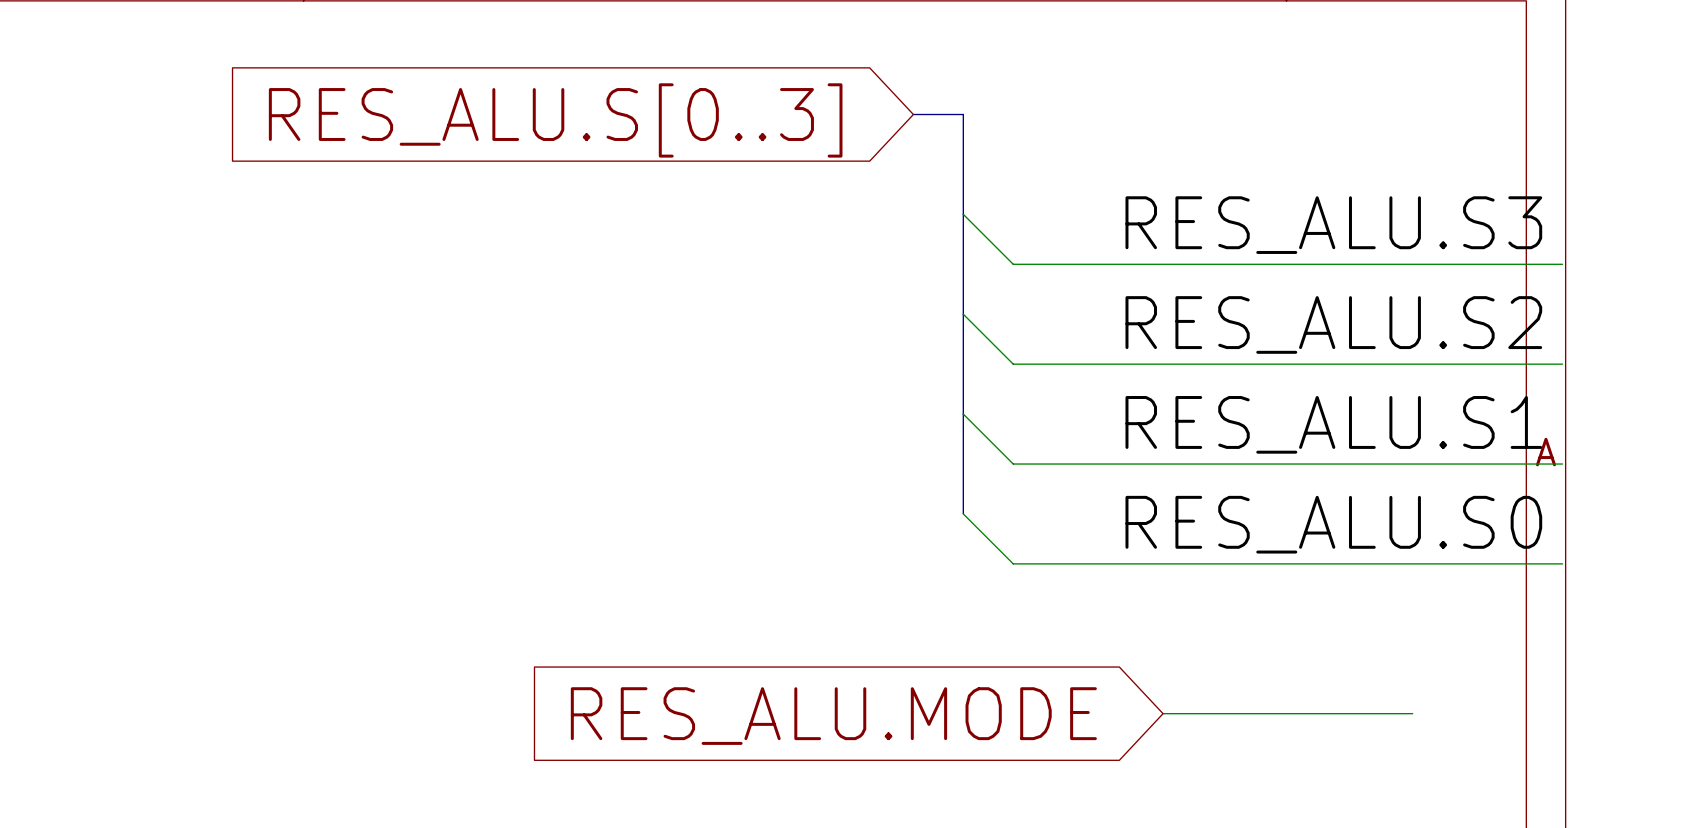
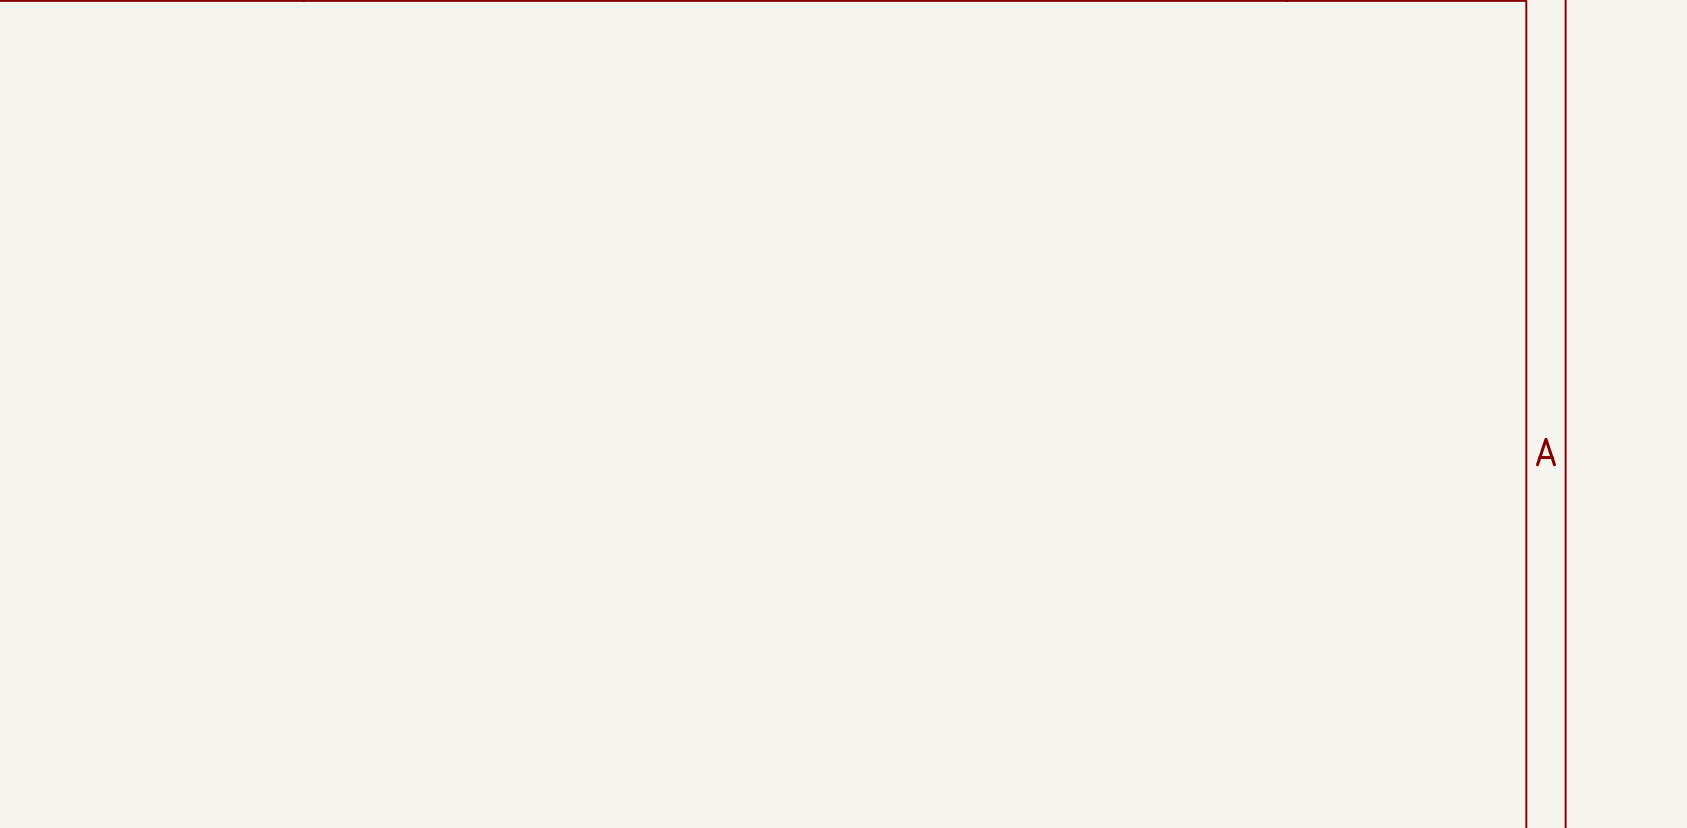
bus: (913, 114) (963, 114) (963, 513) -> none
global label: RES_ALU.S[0..3] (555, 120) -> none
wire: (963, 214) (1013, 264) (1562, 264) -> none
label: RES_ALU.S3 (1333, 225) -> none
wire: (963, 314) (1013, 364) (1562, 364) -> none
label: RES_ALU.S2 (1333, 324) -> none
wire: (963, 414) (1013, 464) (1562, 464) -> none
label: RES_ALU.S1 (1333, 424) -> none
wire: (963, 513) (1013, 563) (1562, 563) -> none
label: RES_ALU.S0 (1333, 524) -> none
wire: (1163, 713) (1412, 713) -> none
global label: RES_ALU.MODE (833, 716) -> none

